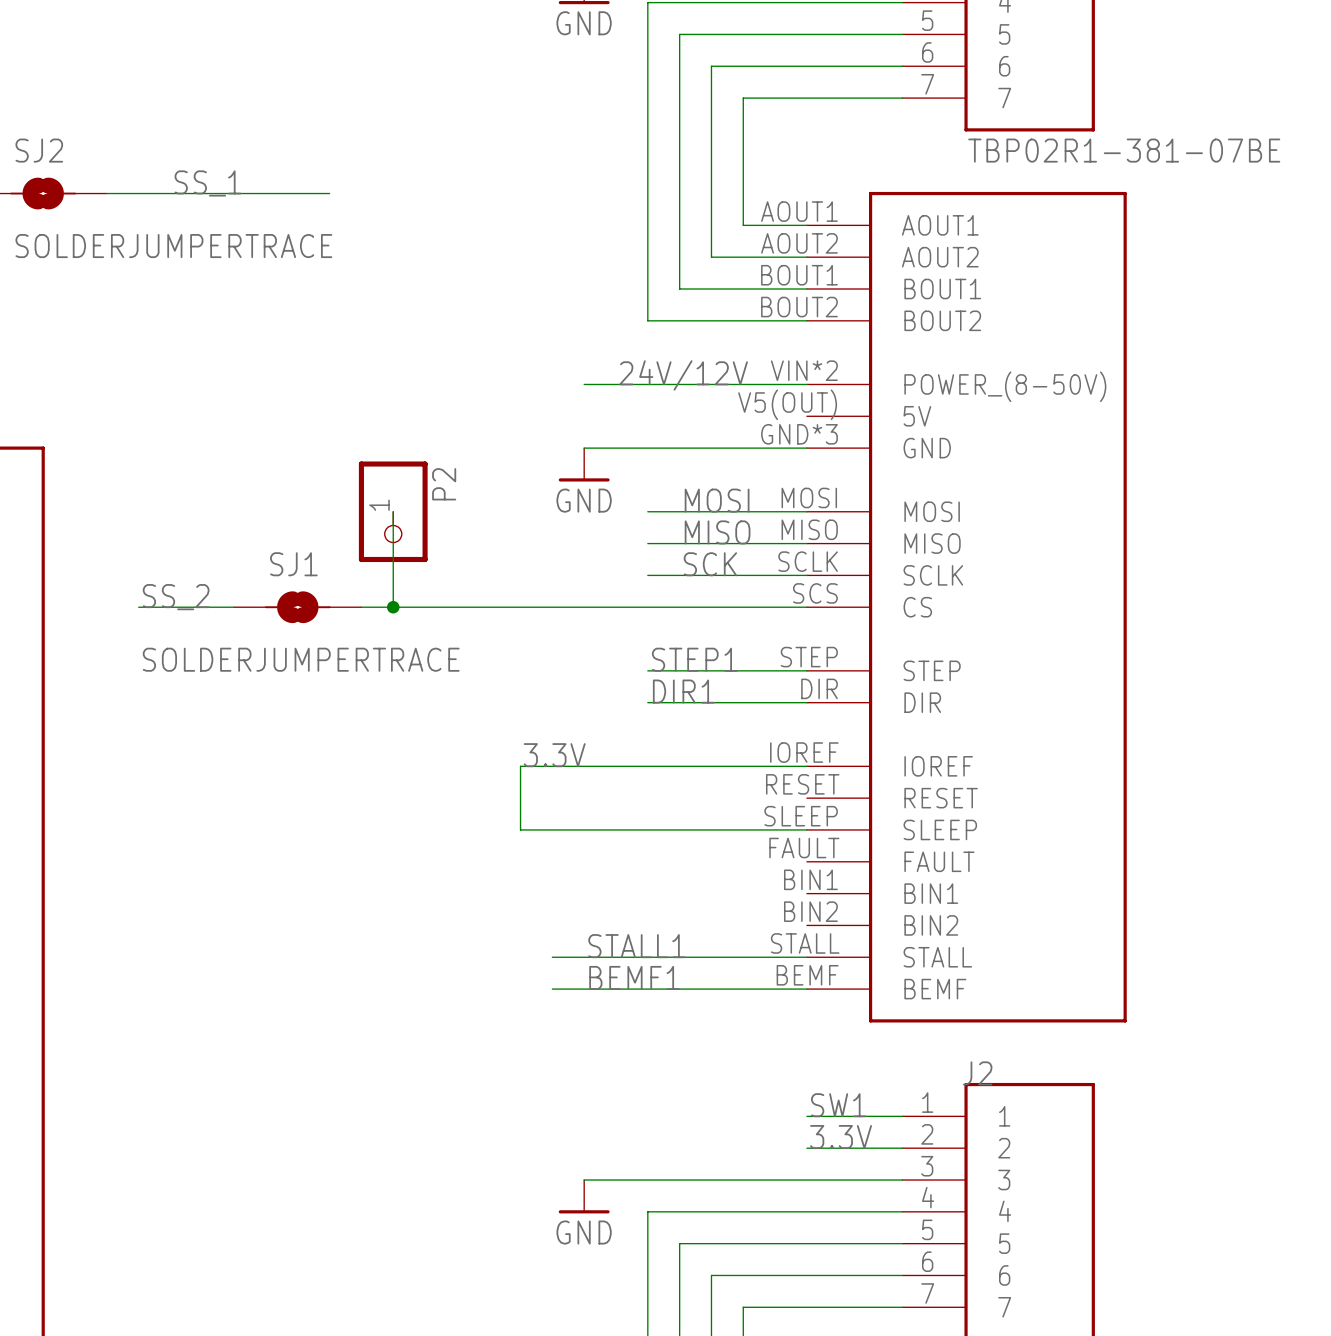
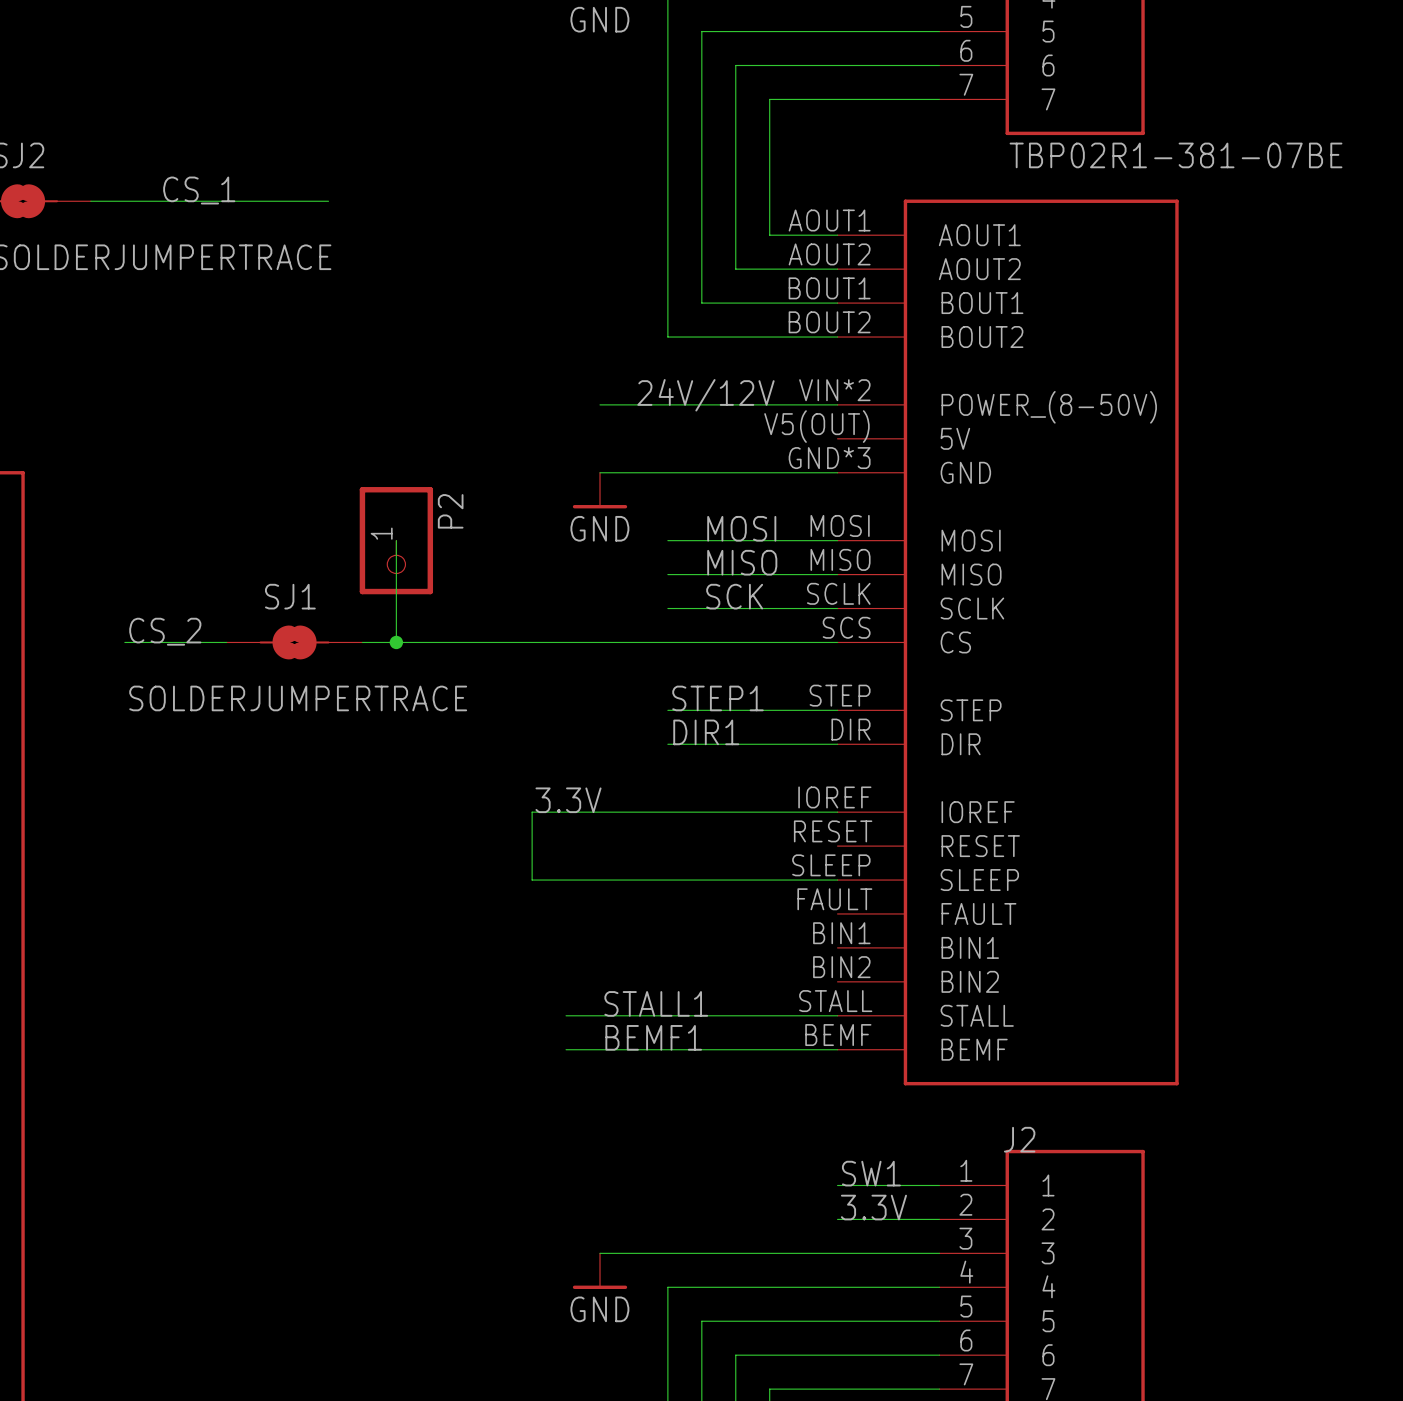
label: SS_1 (207, 183) -> CS_1 (199, 190)
label: SS_2 (176, 597) -> CS_2 (165, 631)

